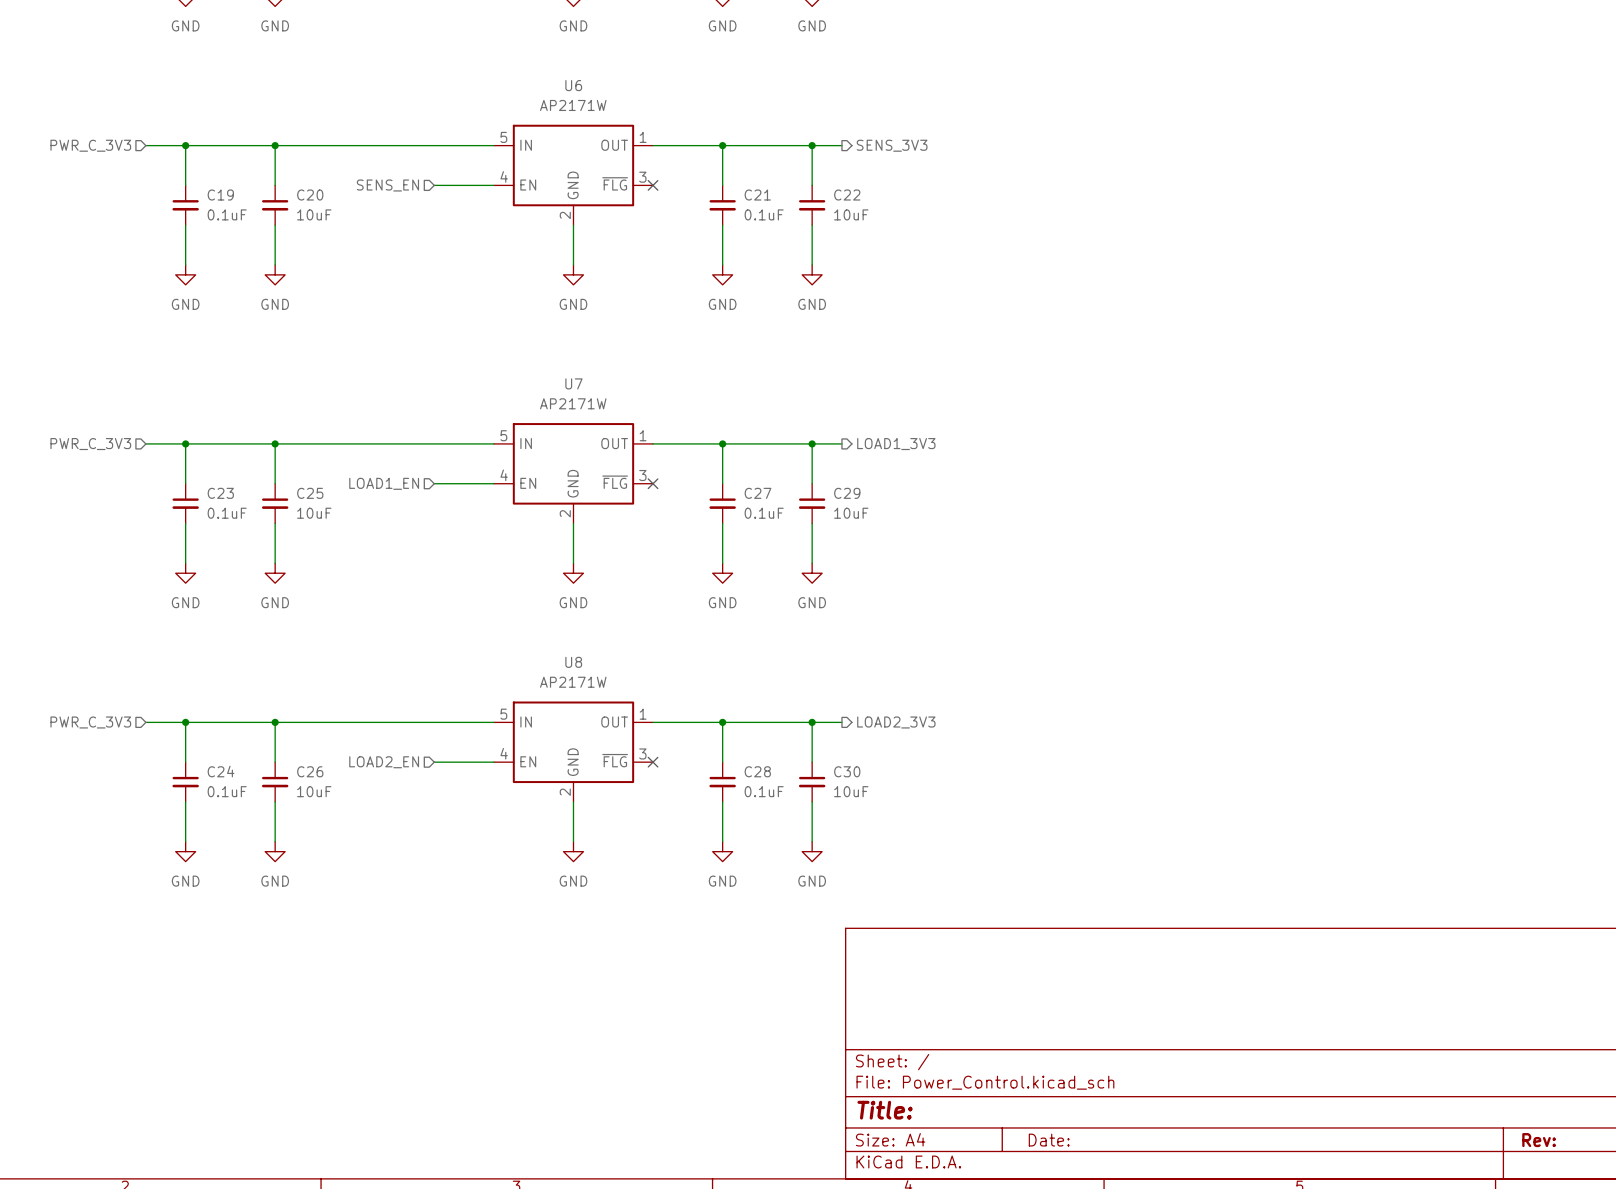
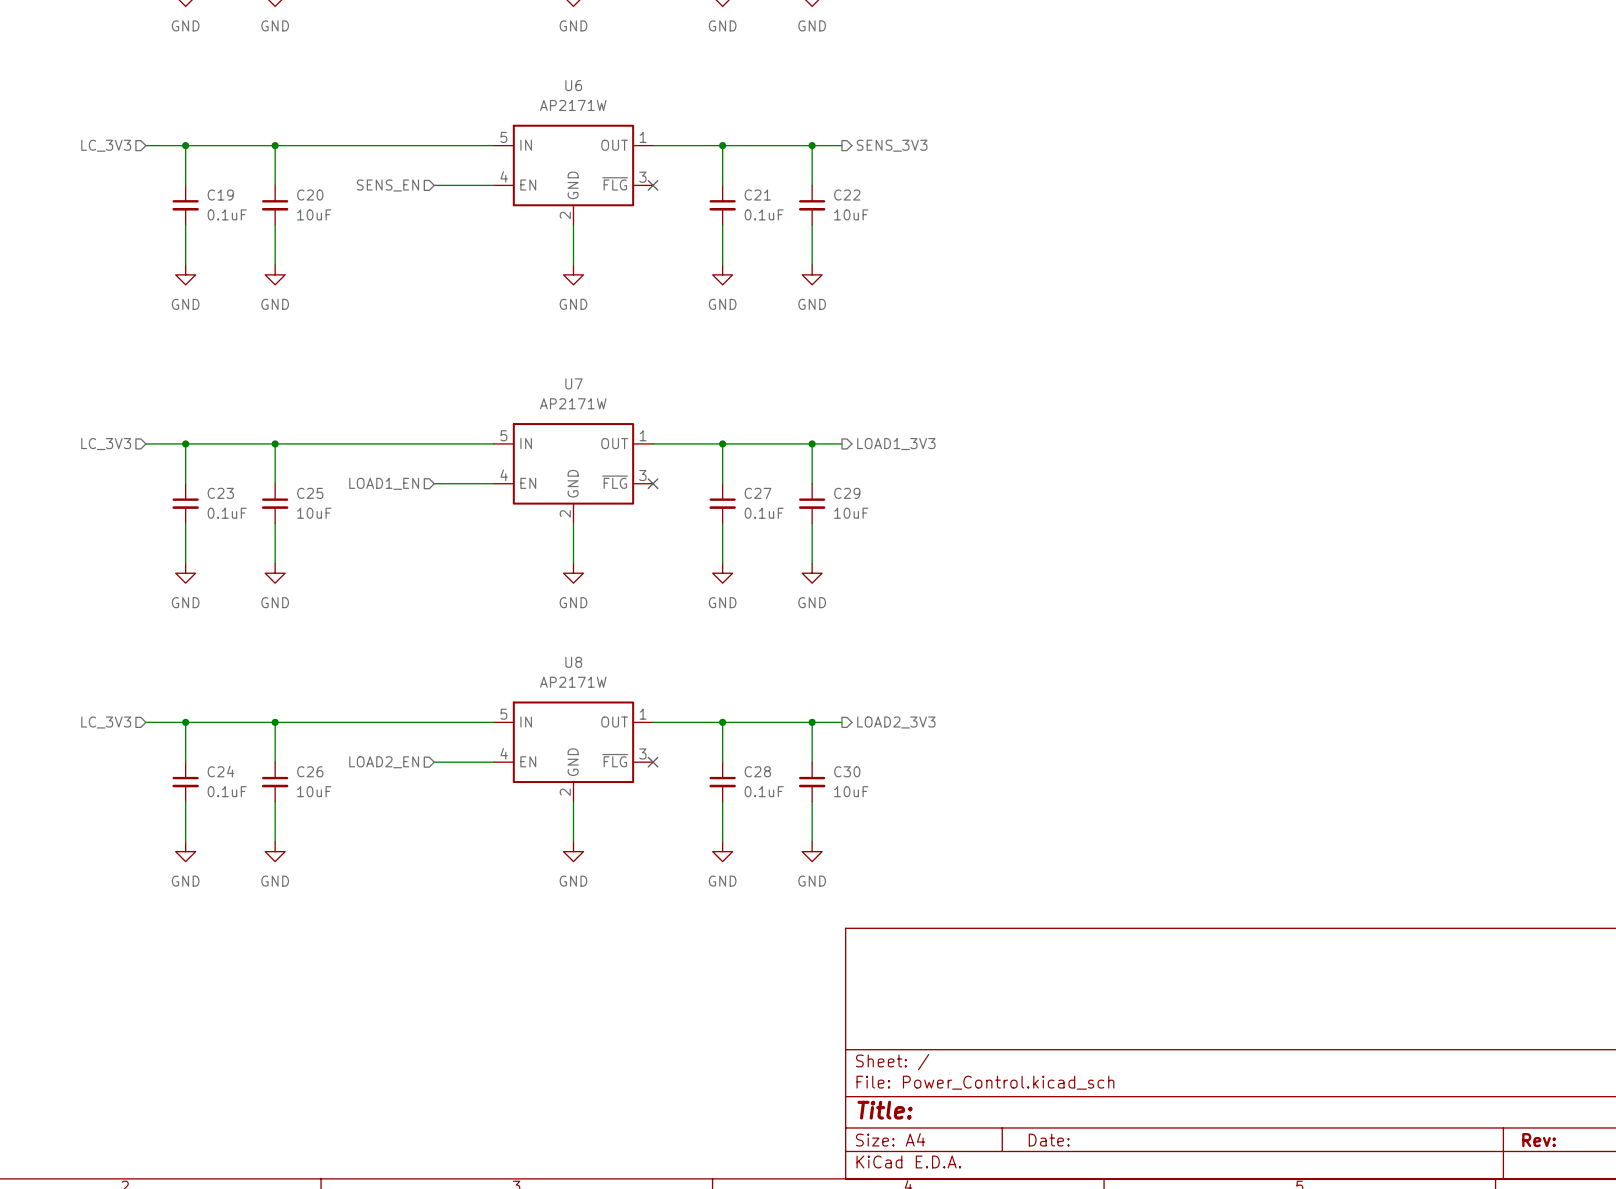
hierarchical label: PWR_C_3V3 (90, 145) -> LC_3V3 (106, 145)
hierarchical label: PWR_C_3V3 (90, 444) -> LC_3V3 (106, 444)
hierarchical label: PWR_C_3V3 (90, 722) -> LC_3V3 (106, 722)

